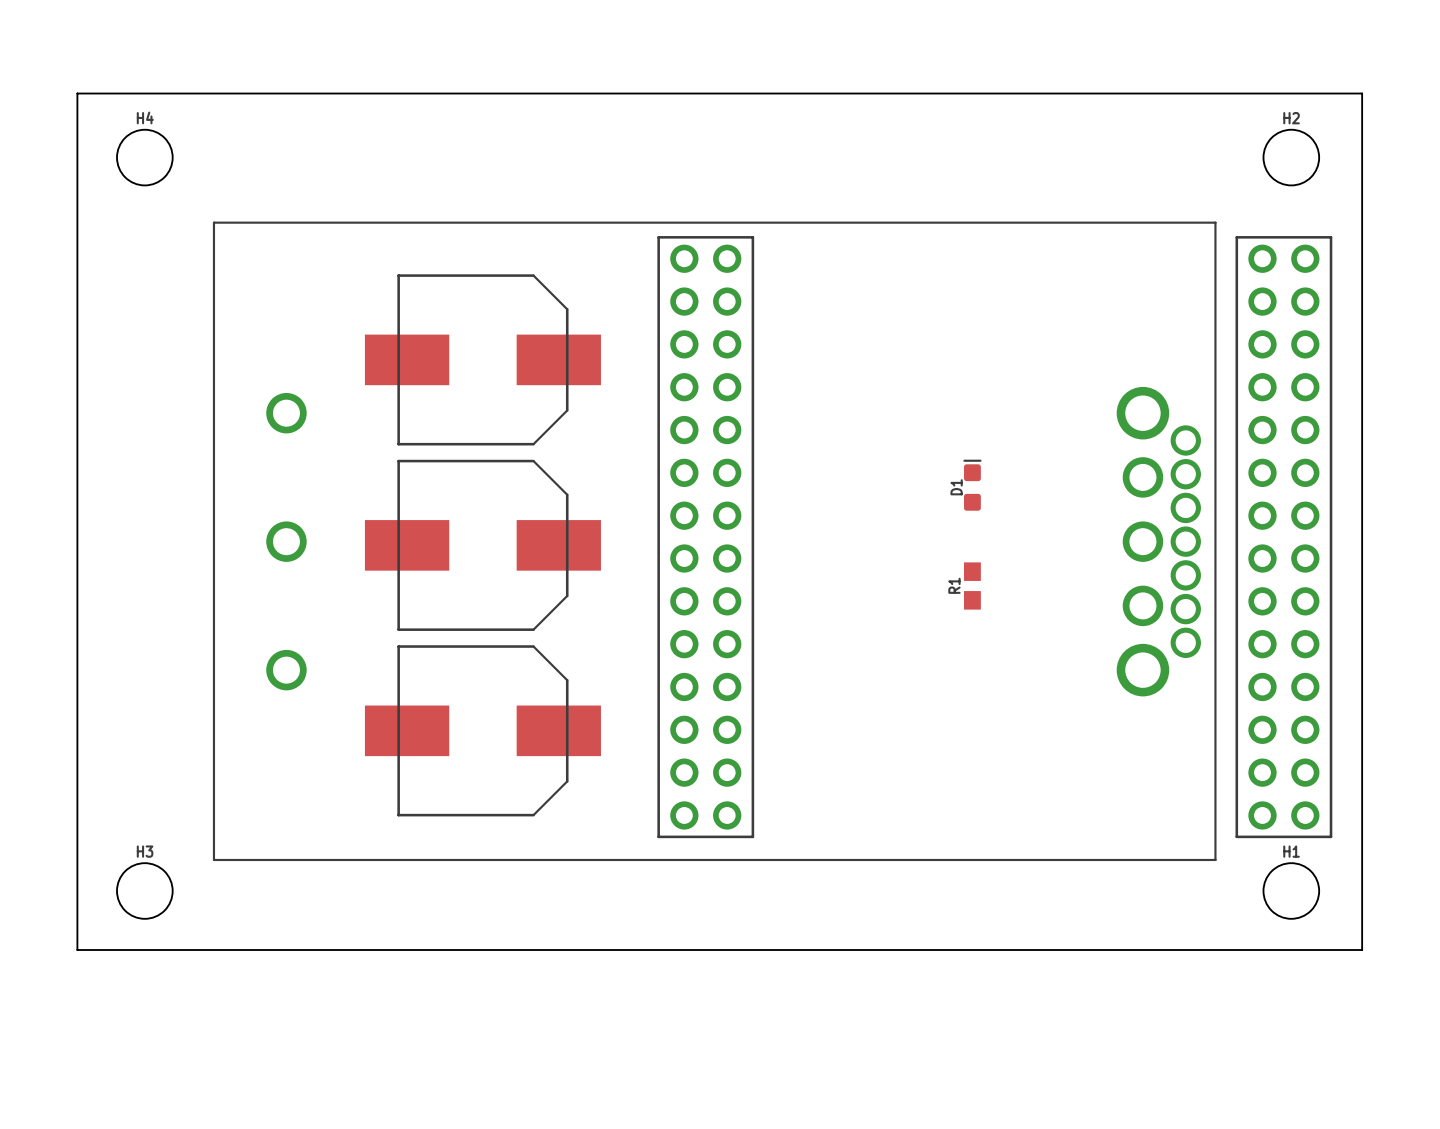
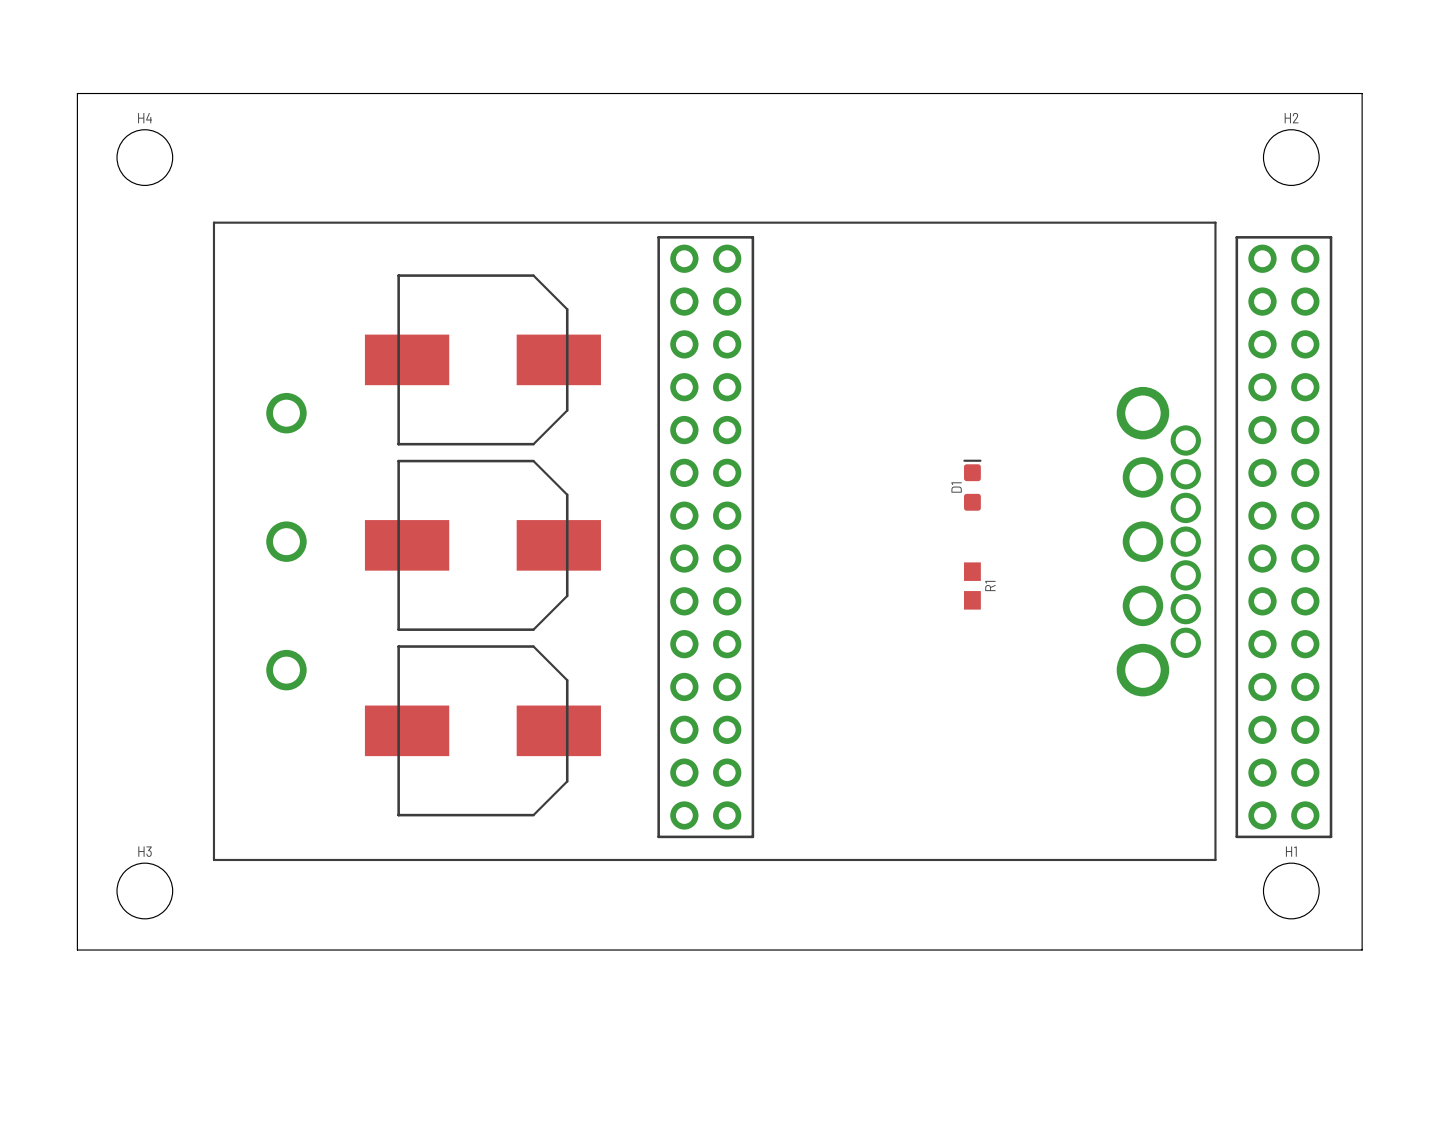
R1 name position: R1 (954, 585) -> R1 (990, 585)

